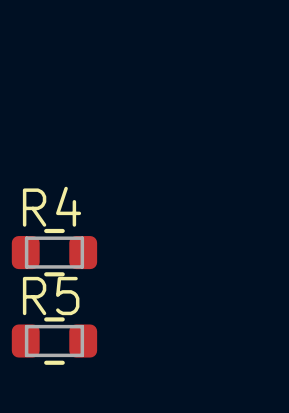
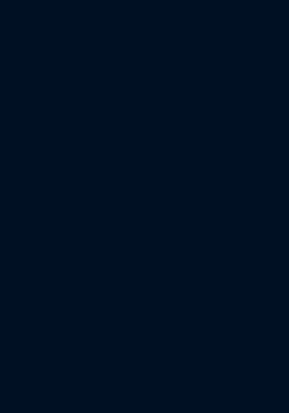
R4: (54, 252) -> none
R5: (54, 341) -> none

